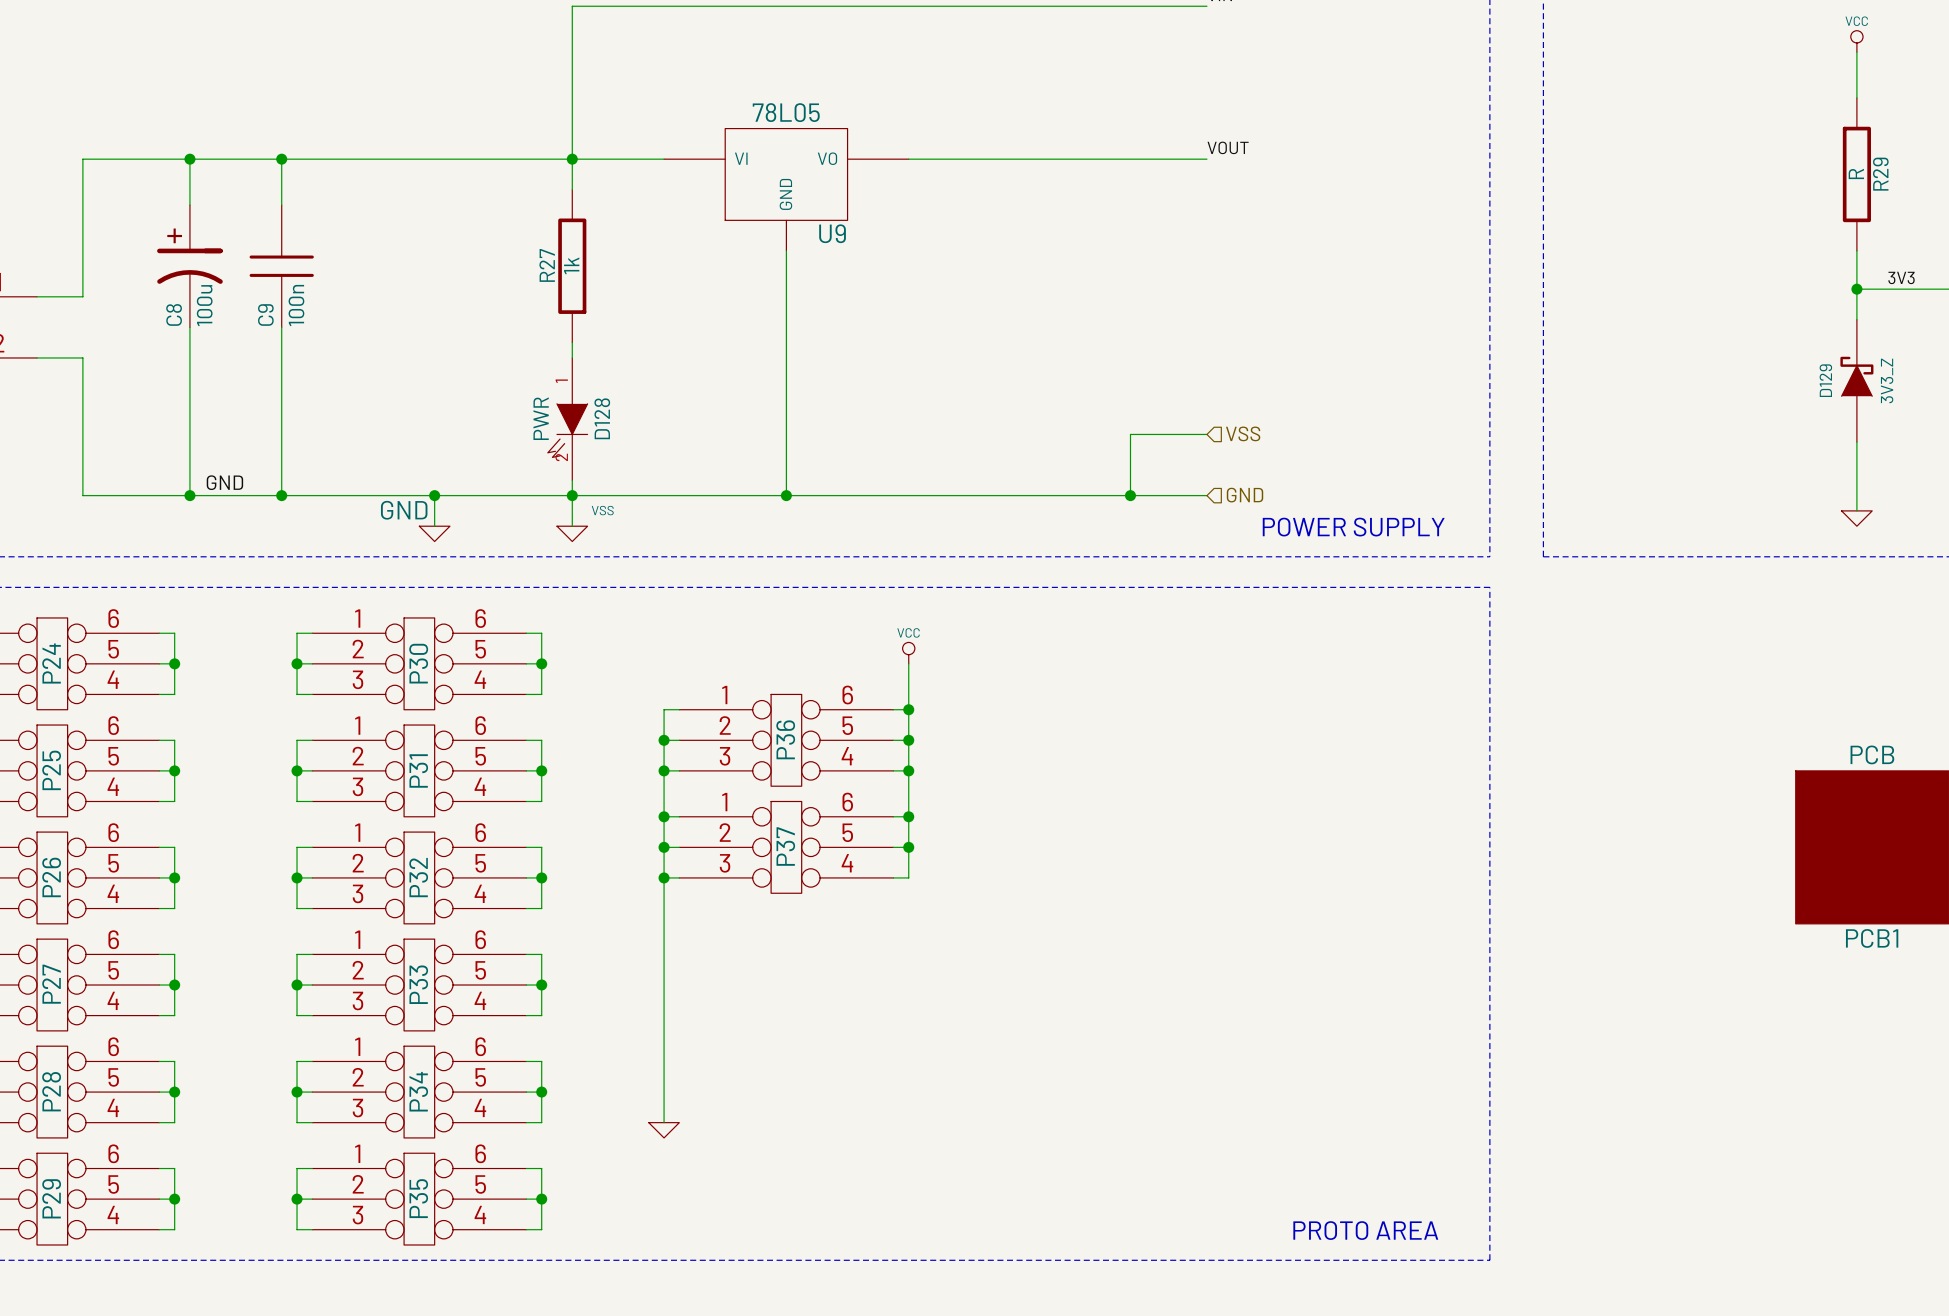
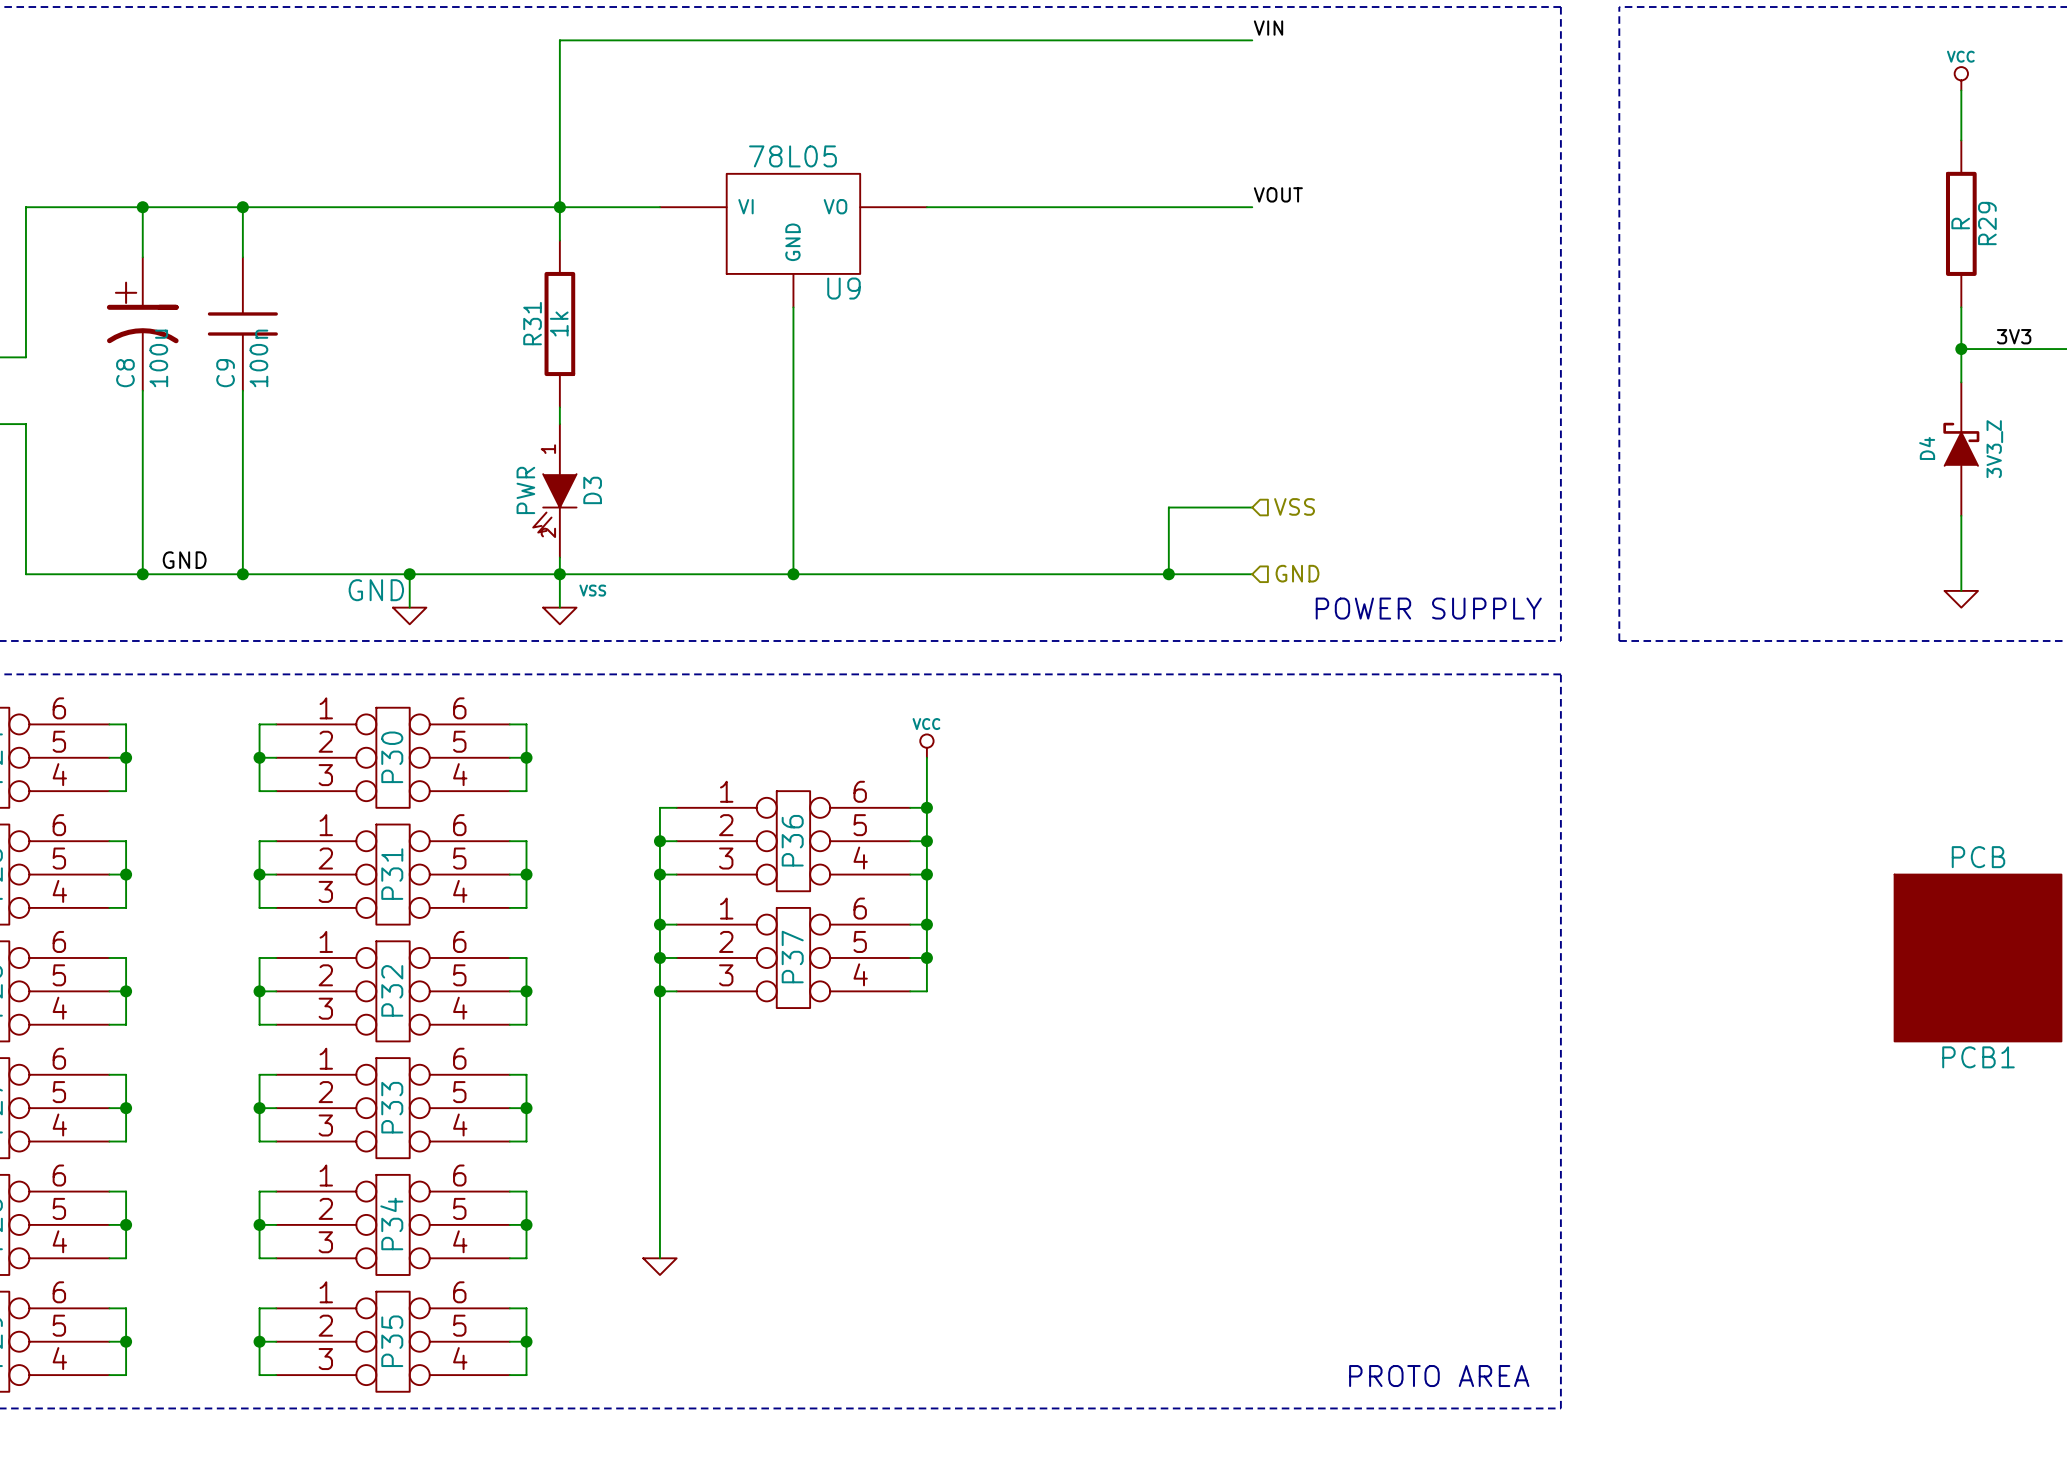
R27 name: R27 (547, 265) -> R31 (532, 323)
D129 name: D129 (1825, 380) -> D4 (1927, 448)
D128 name: D128 (602, 418) -> D3 (592, 490)

